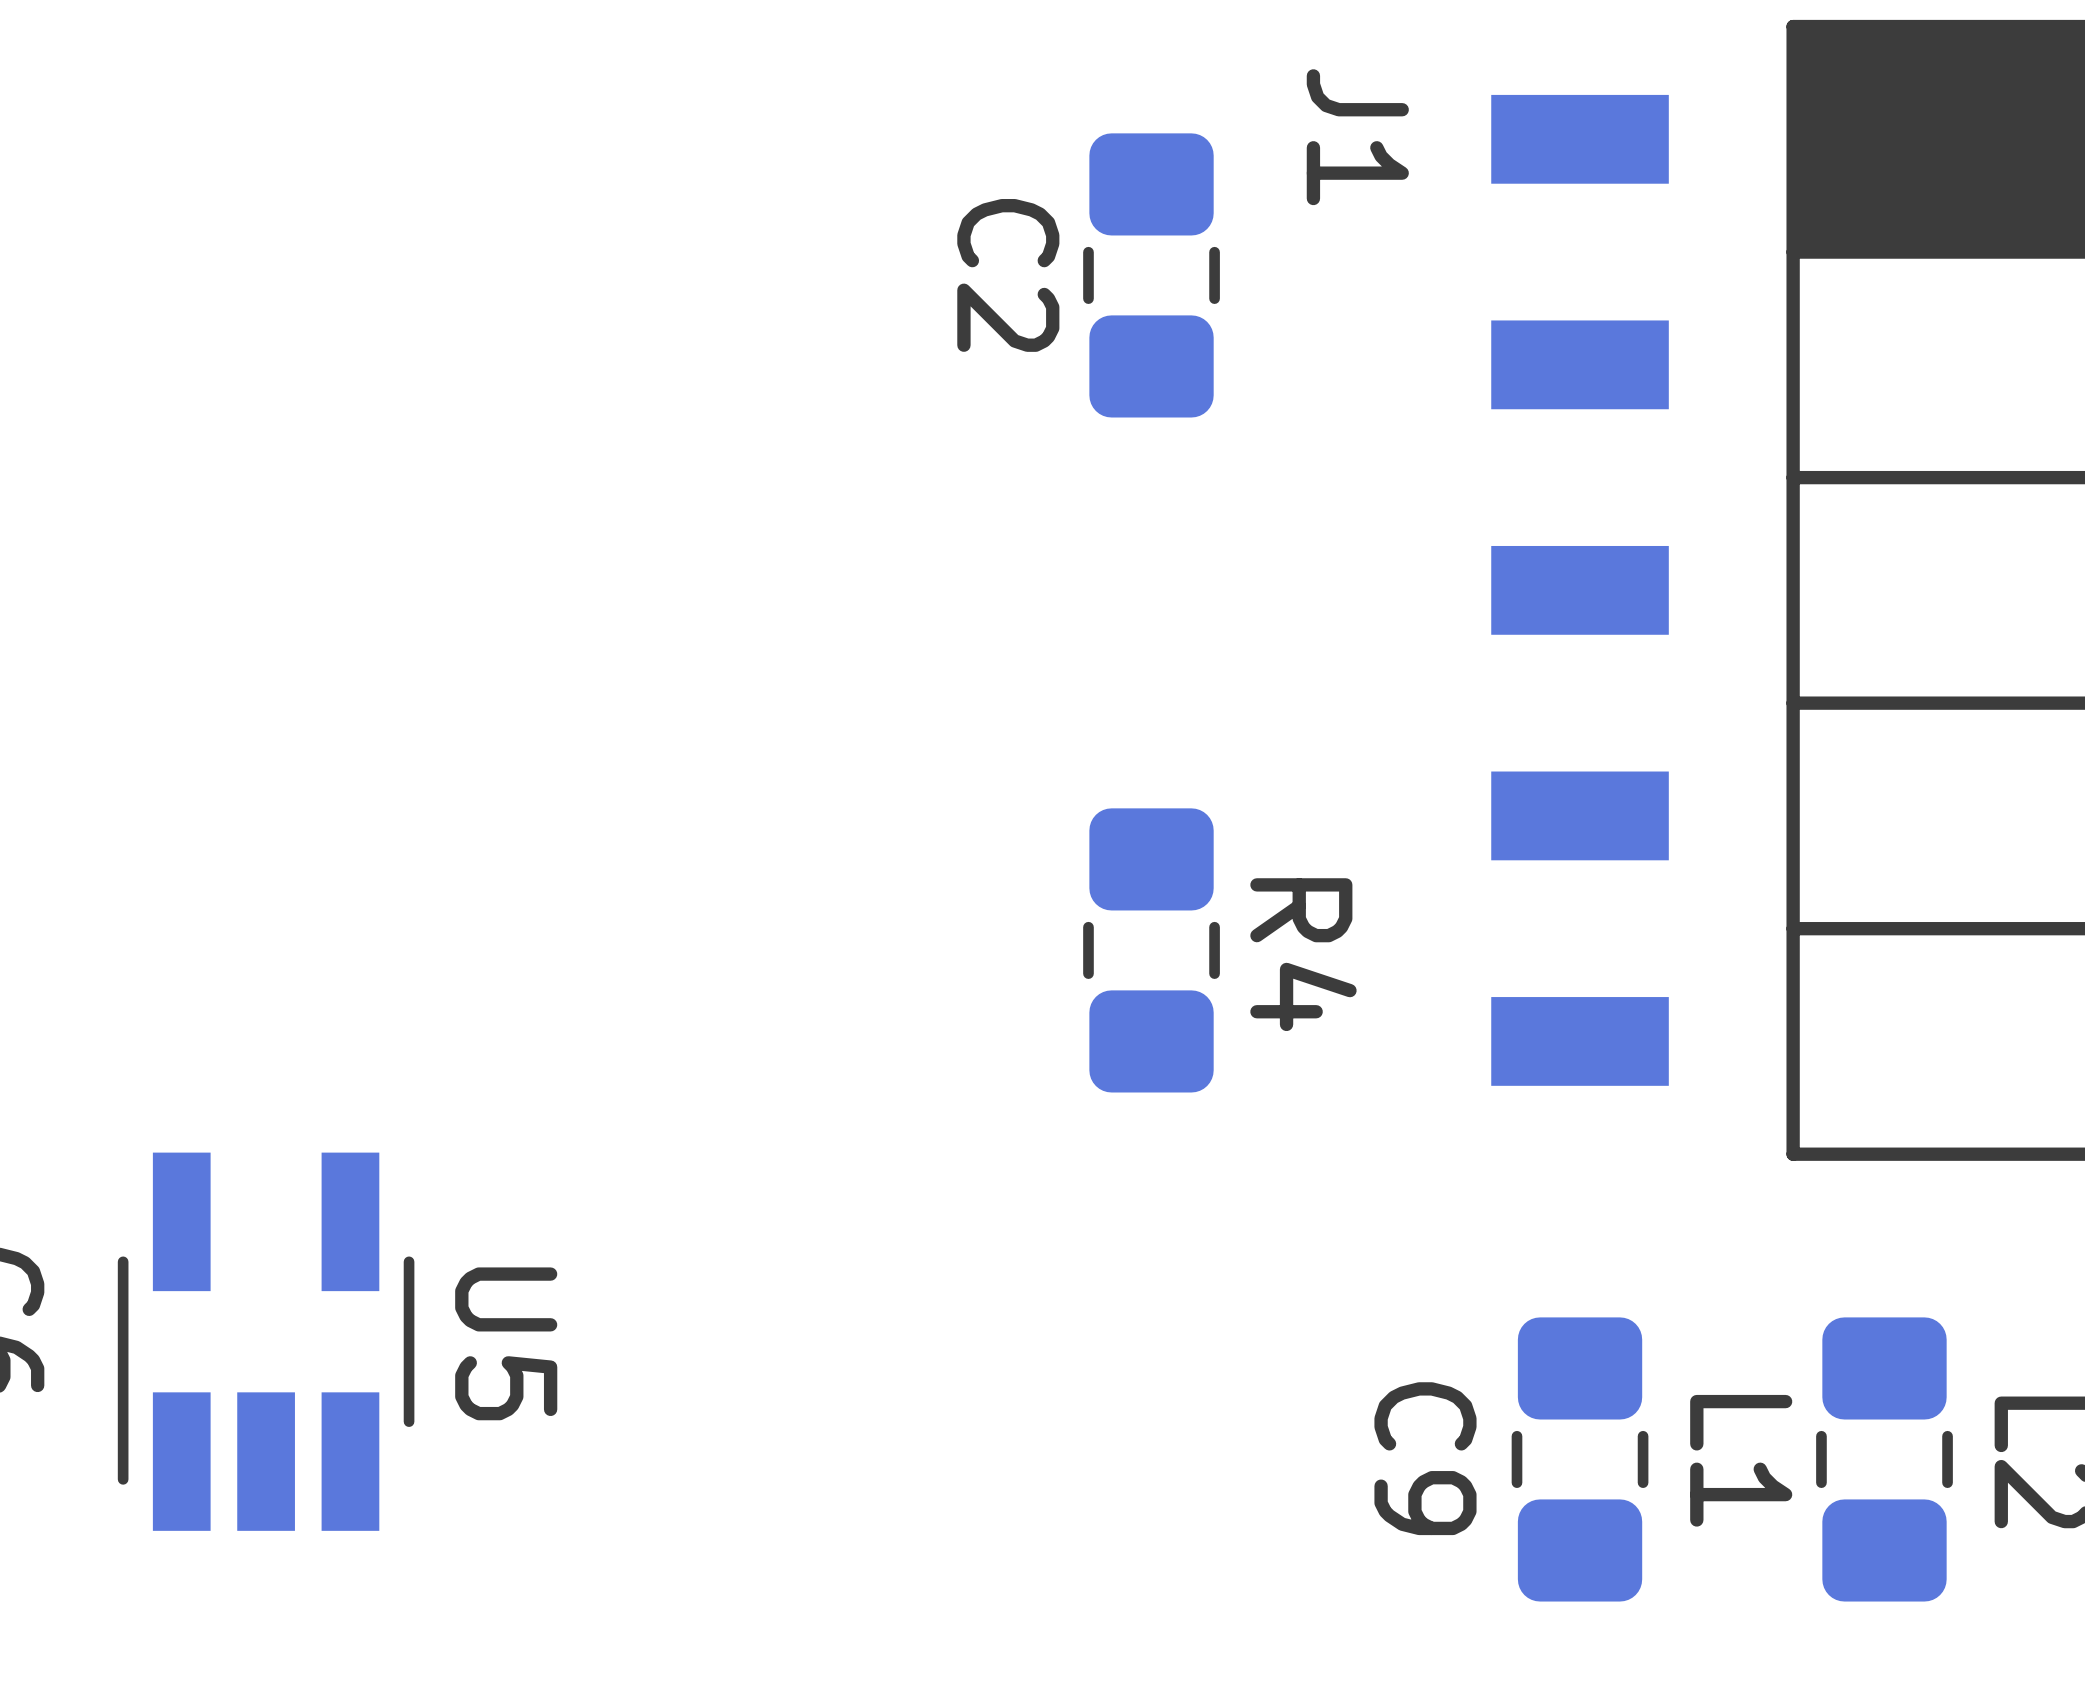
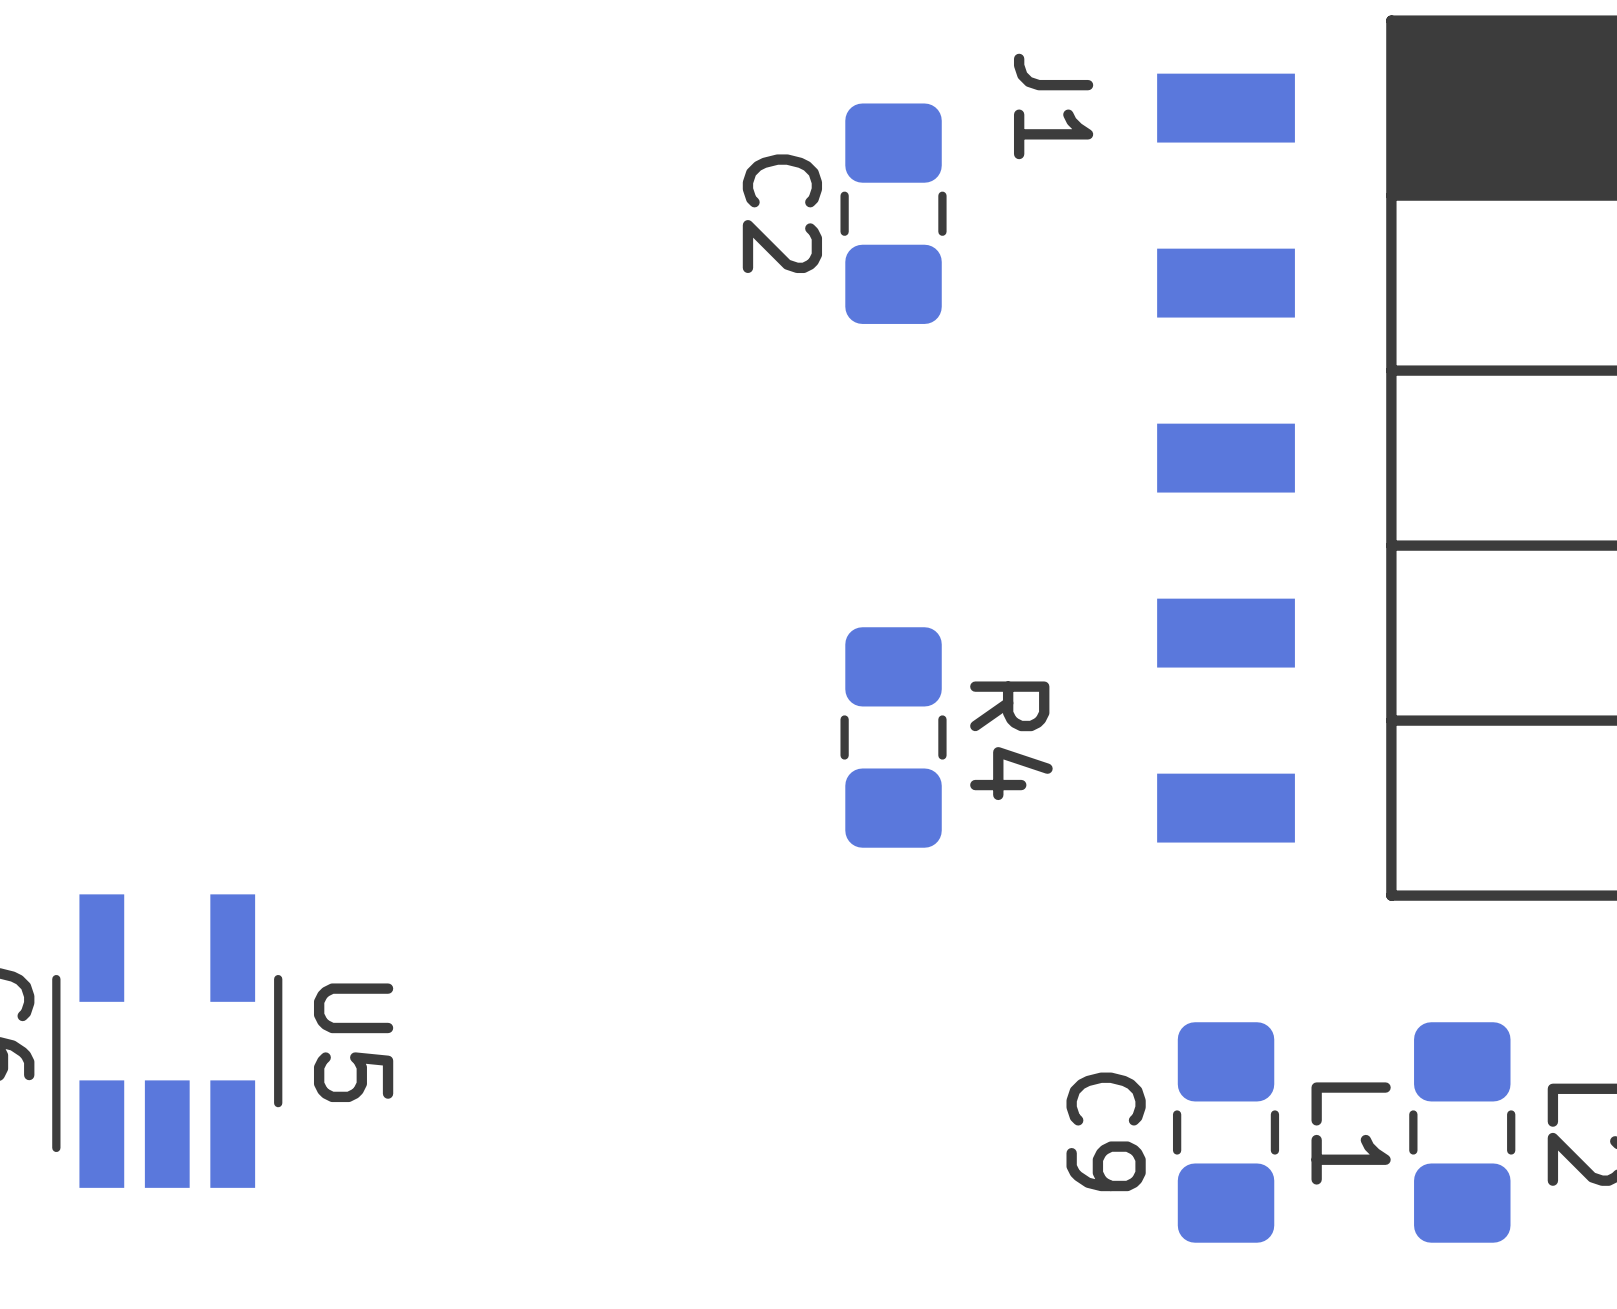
U5 position: (266, 1341) -> (167, 1041)

